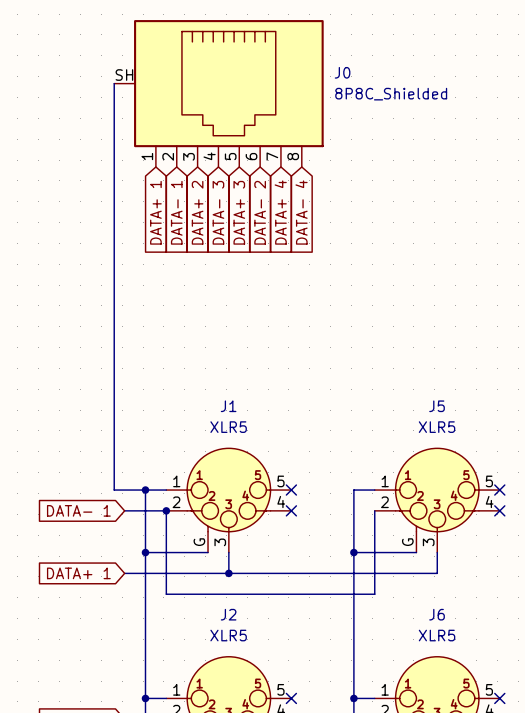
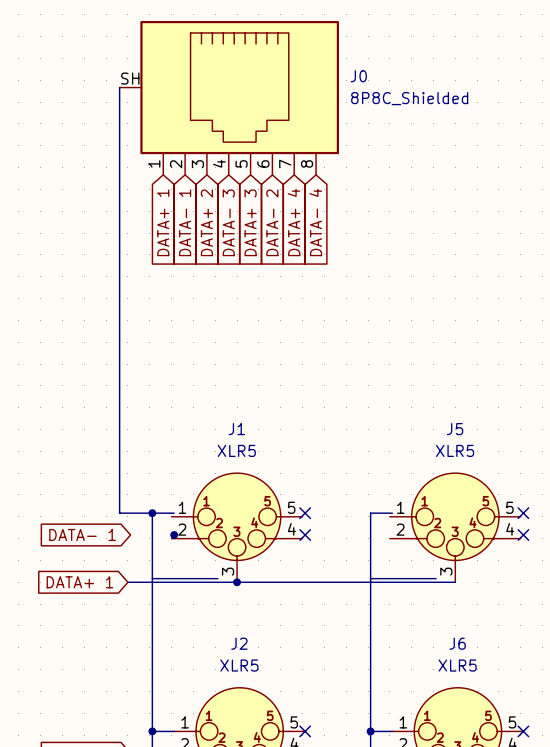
J1 symbol: [166, 448, 292, 553] -> [171, 473, 303, 583]
J5 symbol: [374, 448, 500, 553] -> [389, 473, 521, 583]
wire: (124, 510) (166, 510) (166, 594) (374, 594) (374, 510) -> none
junction: (145, 552) -> none
wire: (228, 552) (228, 573) -> none
junction: (353, 552) -> none
wire: (437, 552) (437, 573) (124, 573) -> none
wire: none -> (127, 582) (455, 582)
global label position: DATA+ 1 (78, 573) -> DATA+ 1 (79, 582)
junction position: (228, 573) -> (237, 582)

